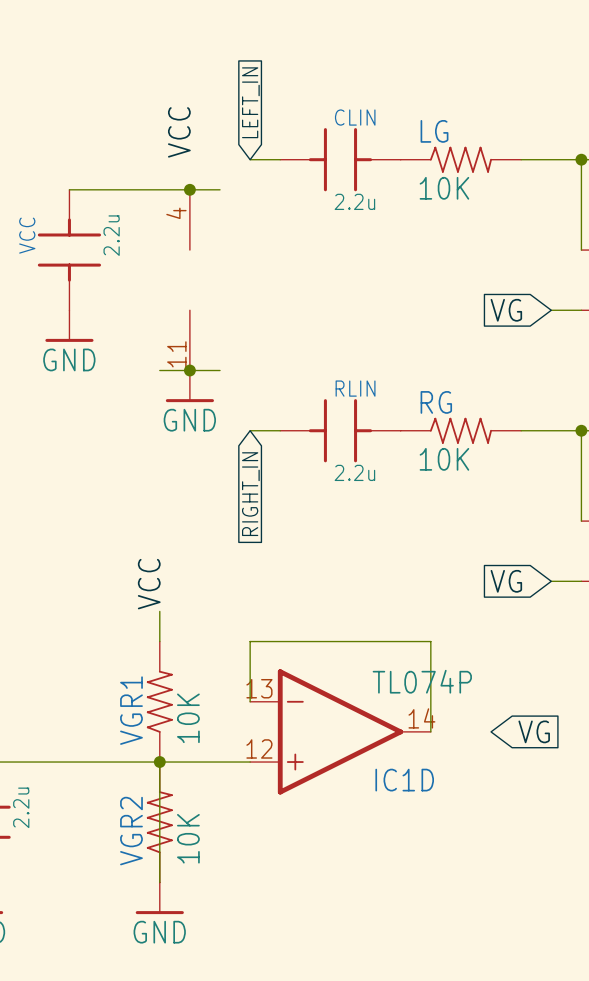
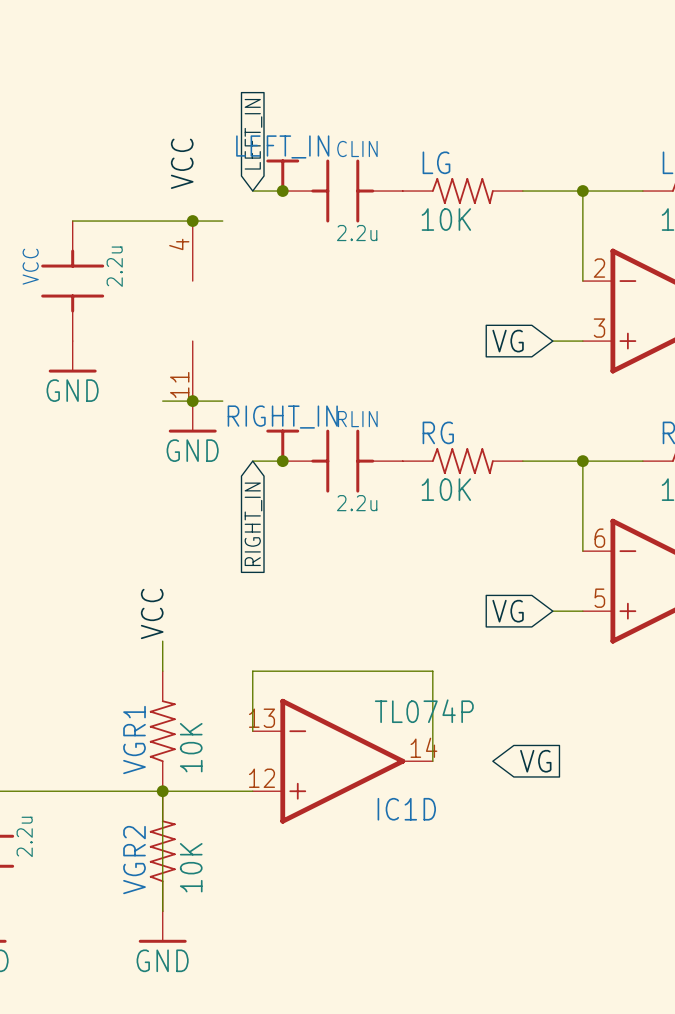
LEFT_IN: none -> (282, 176)
junction: none -> (282, 191)
RIGHT_IN: none -> (282, 446)
junction: none -> (282, 461)

